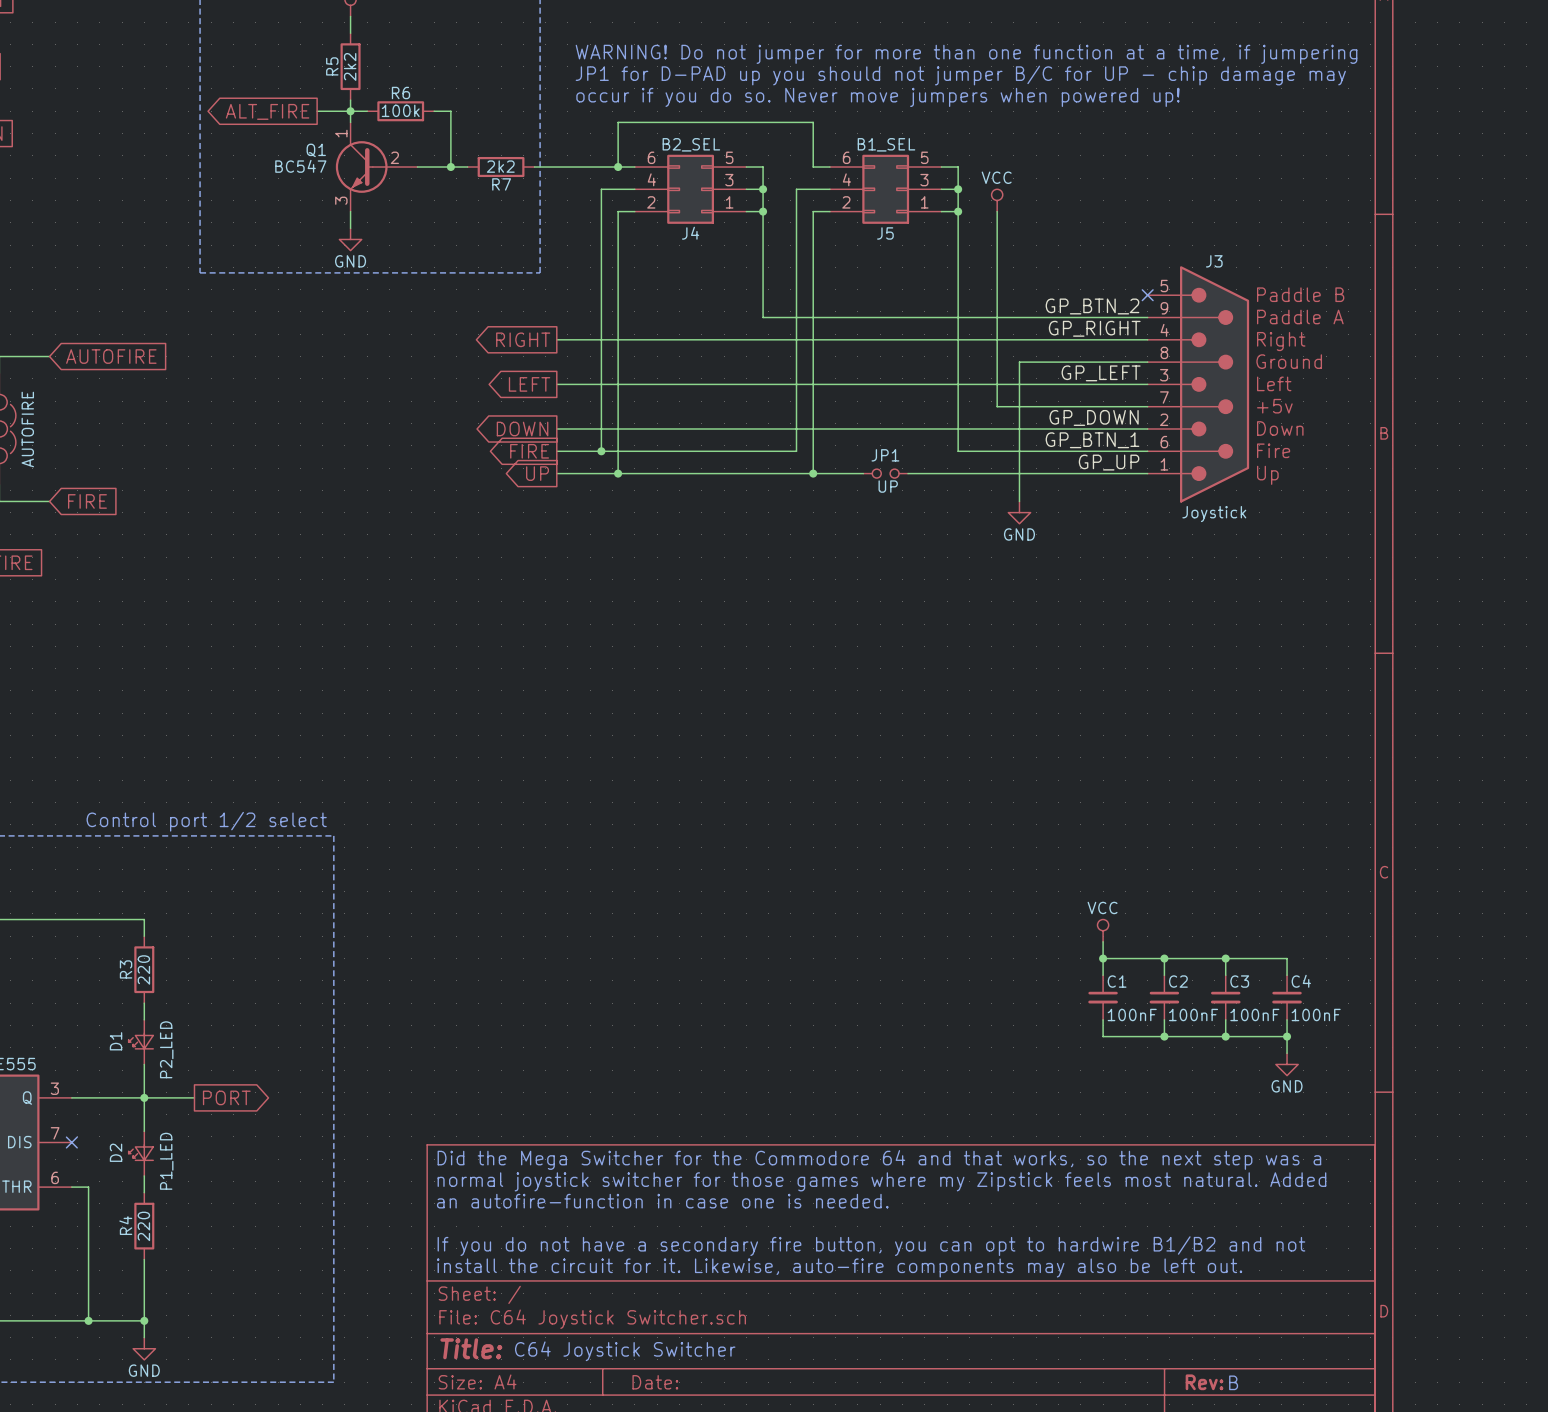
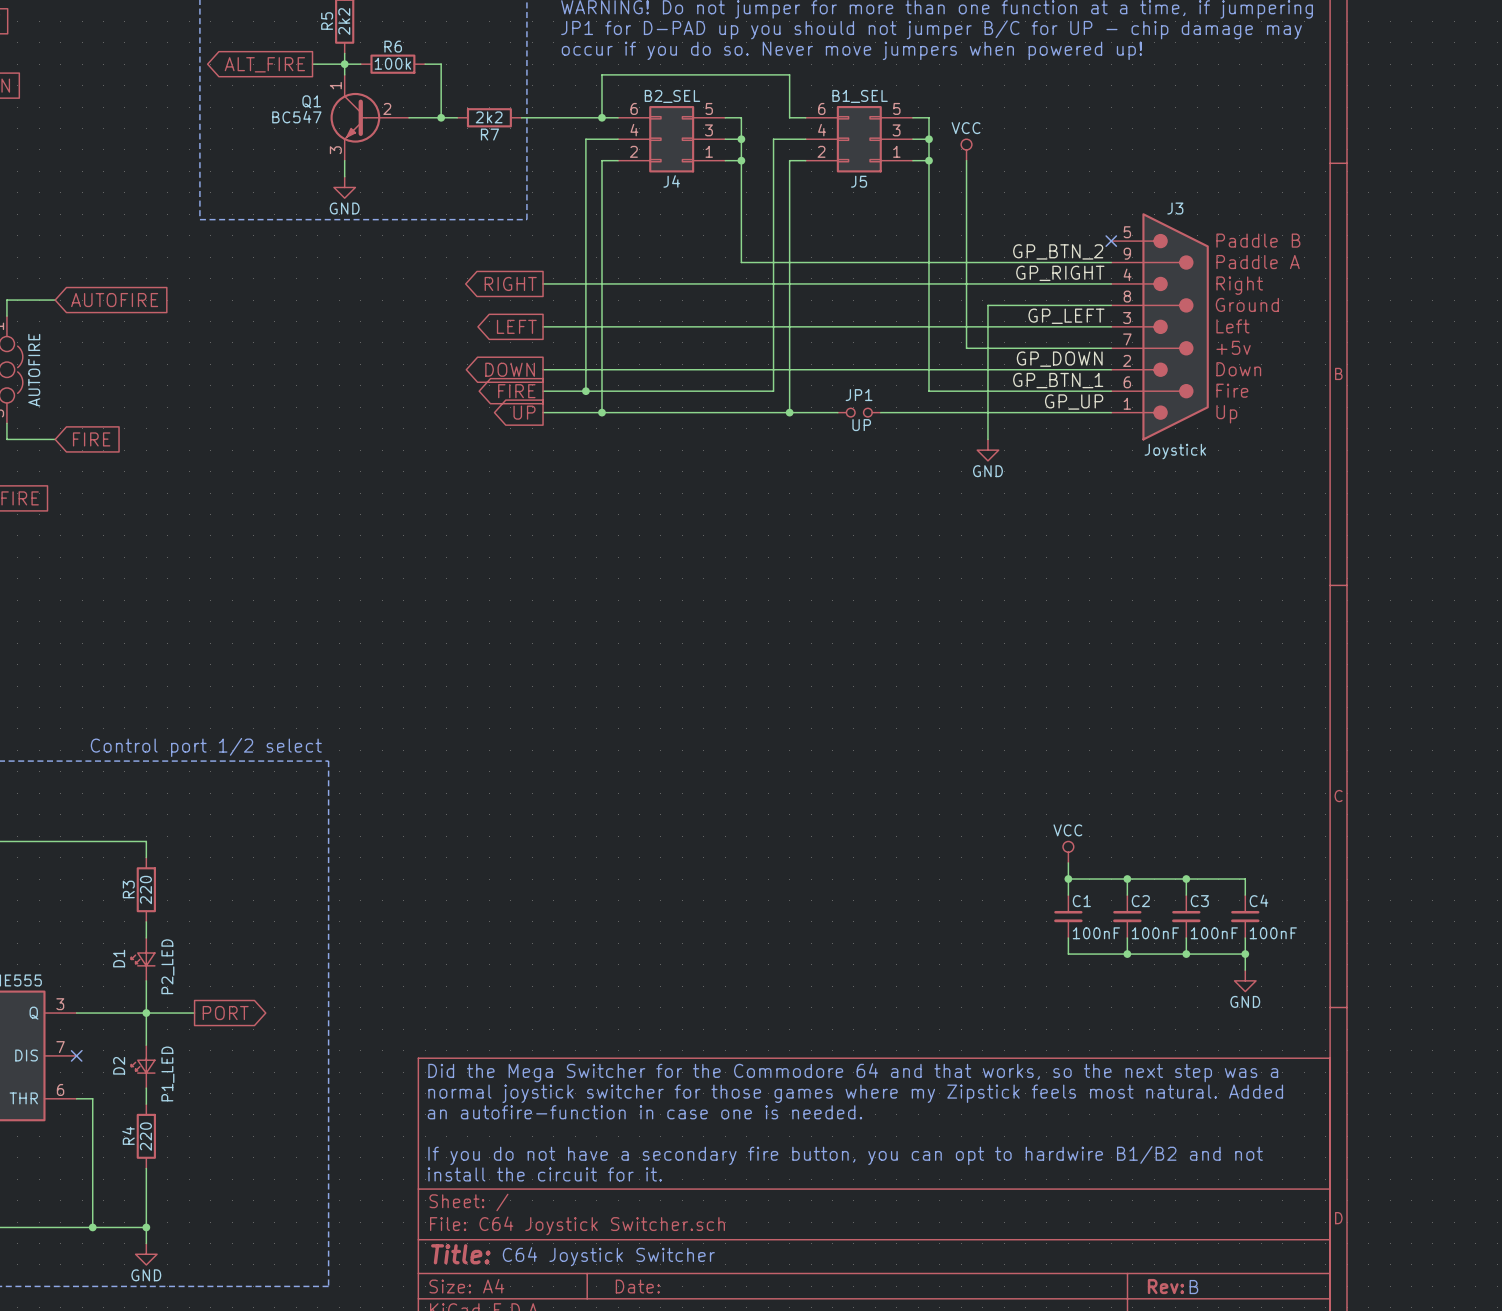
text: install the circuit for it. Likewise, auto-fire components may also be left out. (839, 1267) -> install the circuit for it. (544, 1174)

